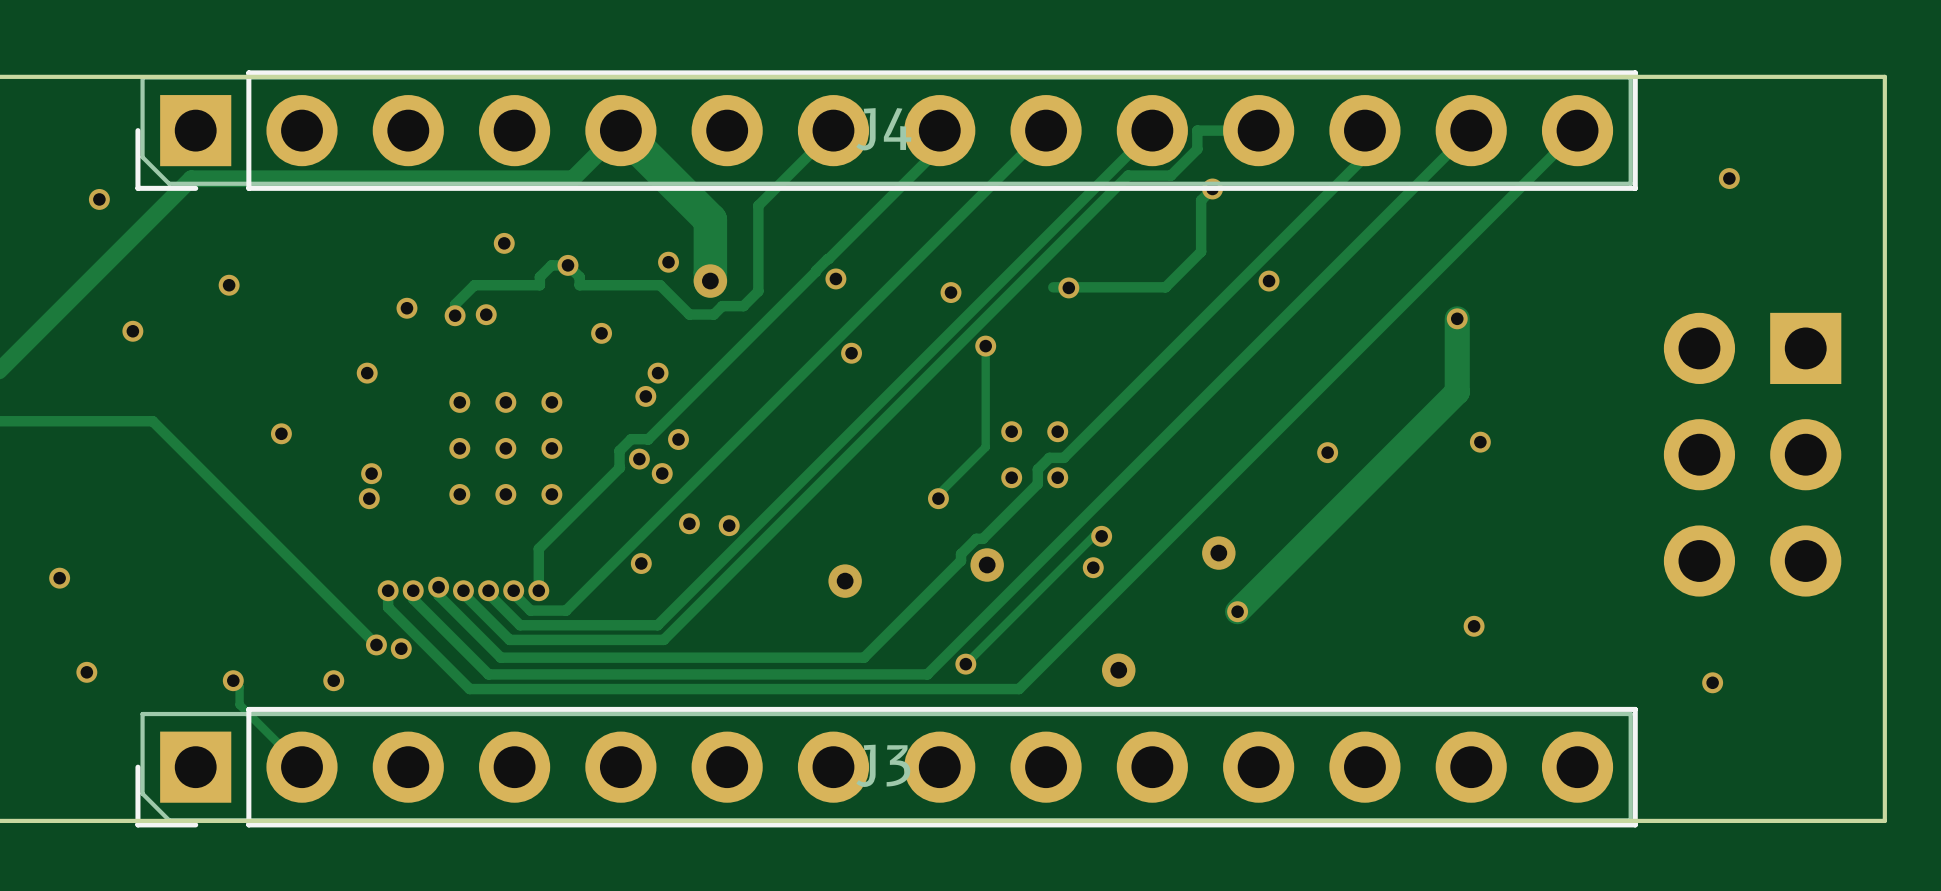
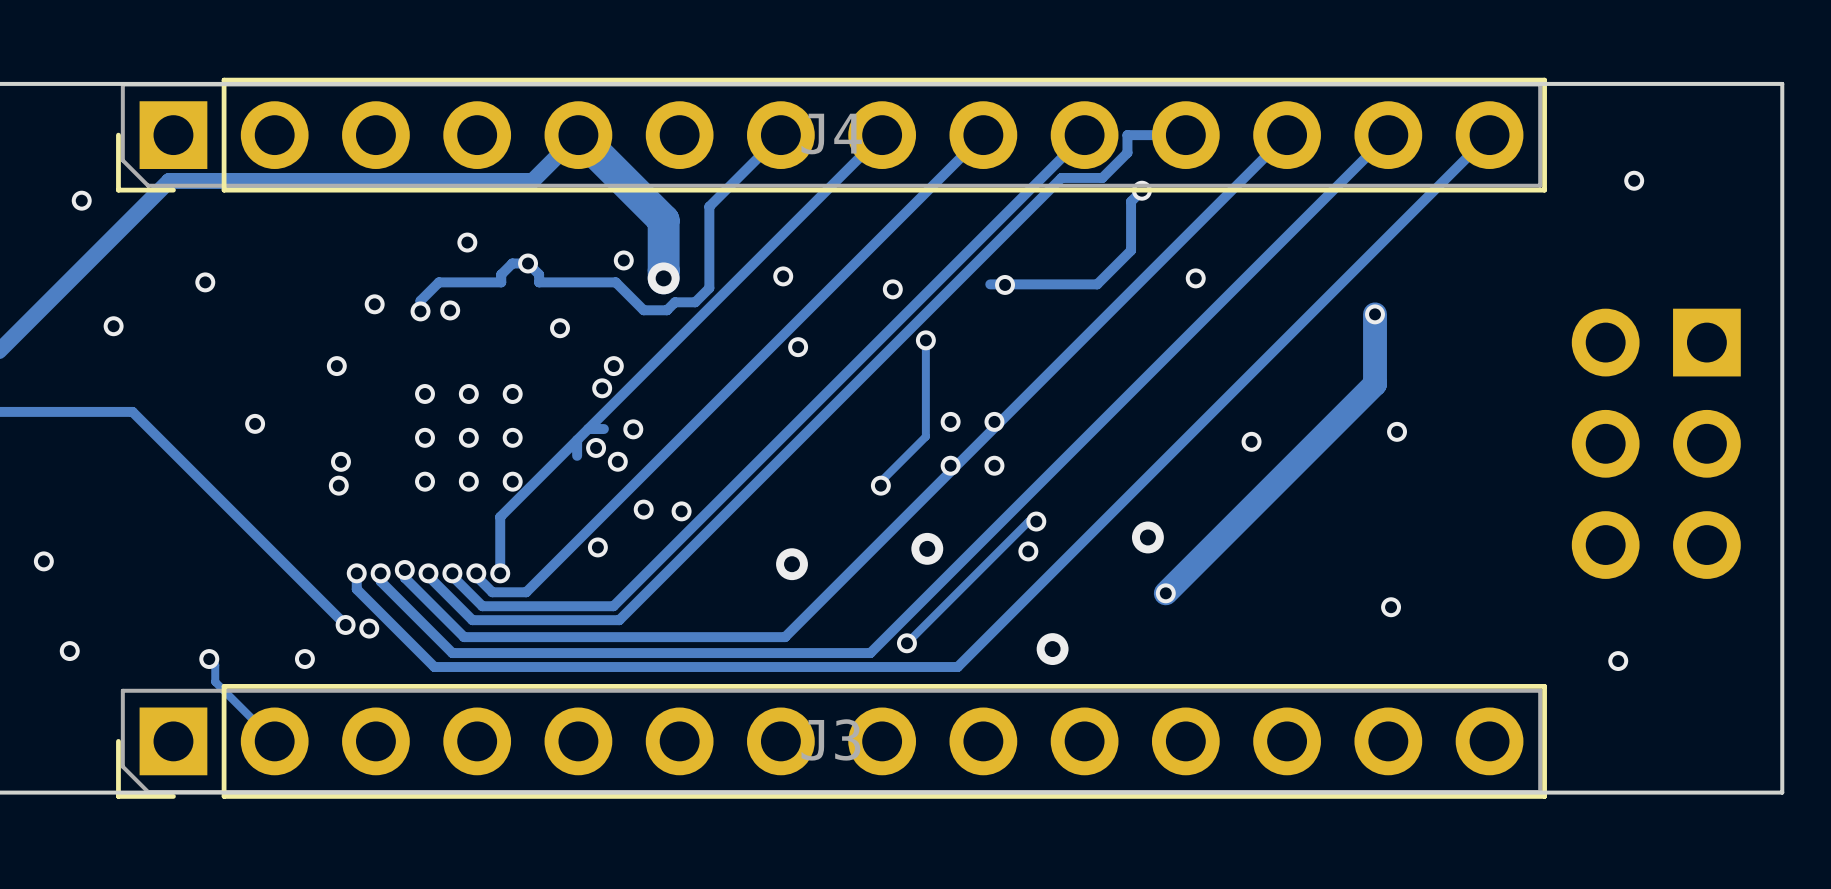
track: (939, 130) (939, 147) (648, 439) -> (882, 135) (588, 429)
track: (1364, 130) (1364, 156) (1063, 457) (1049, 457) (1037, 469) (1037, 483) (982, 538) (976, 538) (961, 554) (961, 560) (864, 657) (837, 657) -> (1287, 135) (785, 637)
track: (619, 467) (538, 548) -> (577, 440) (500, 517) (500, 533)

